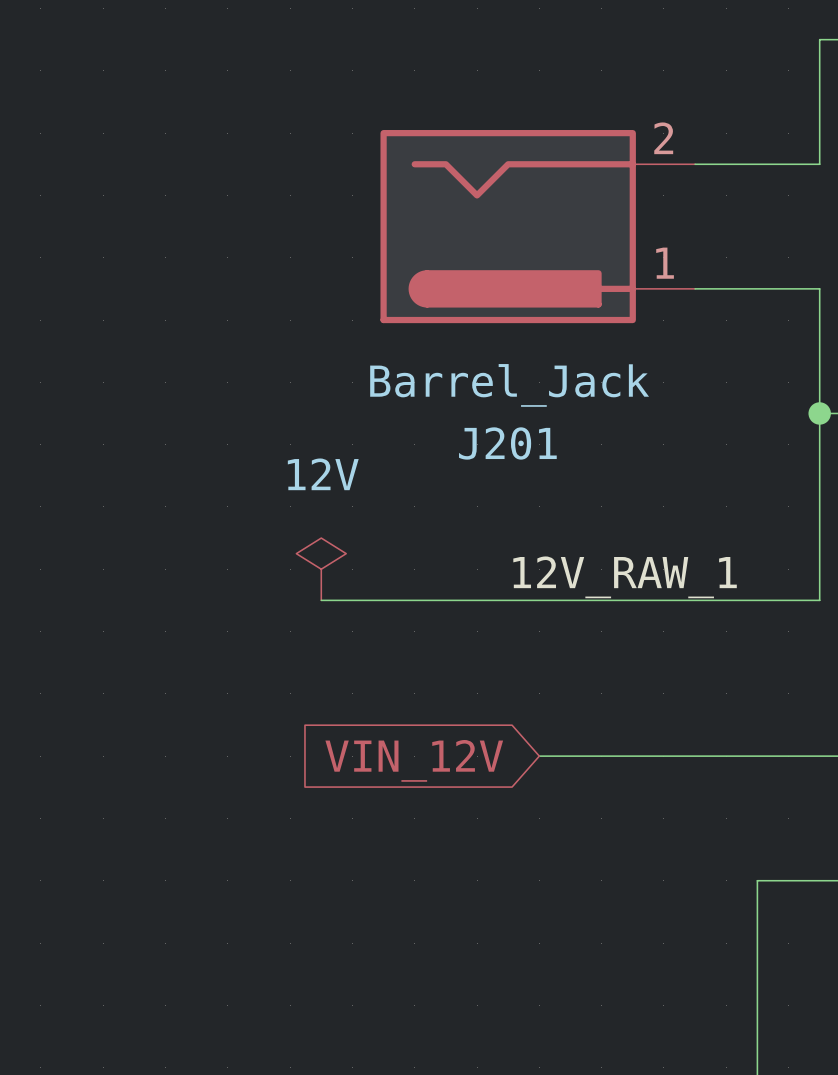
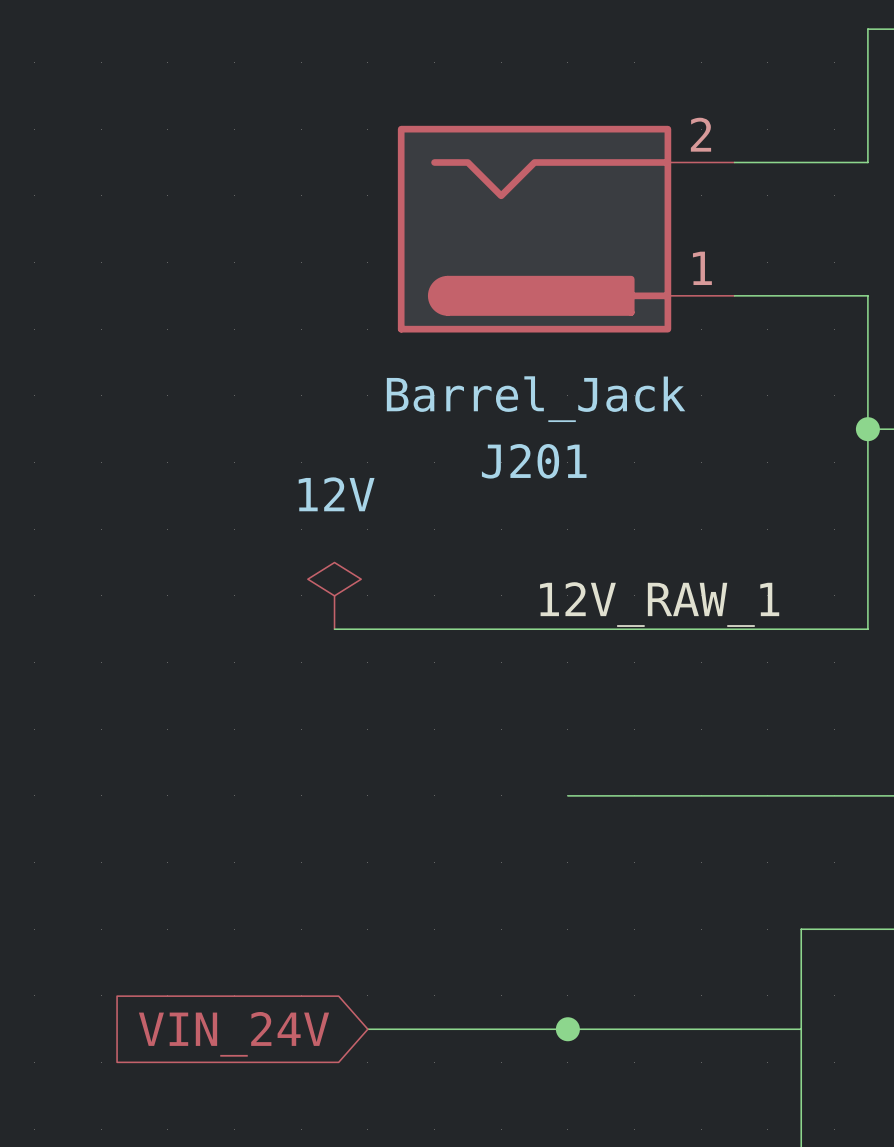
global label: VIN_12V (414, 760) -> none
wire: none -> (367, 1029) (801, 1029)
junction: none -> (567, 1029)
global label: none -> VIN_24V (234, 1034)

